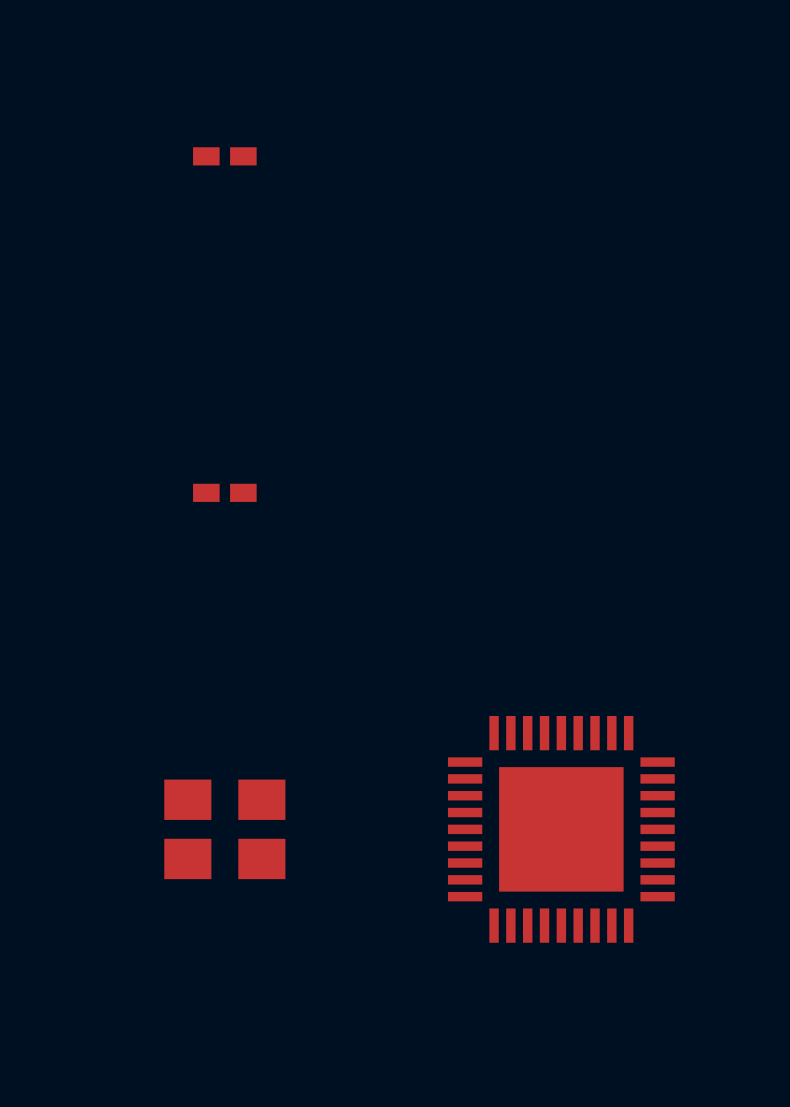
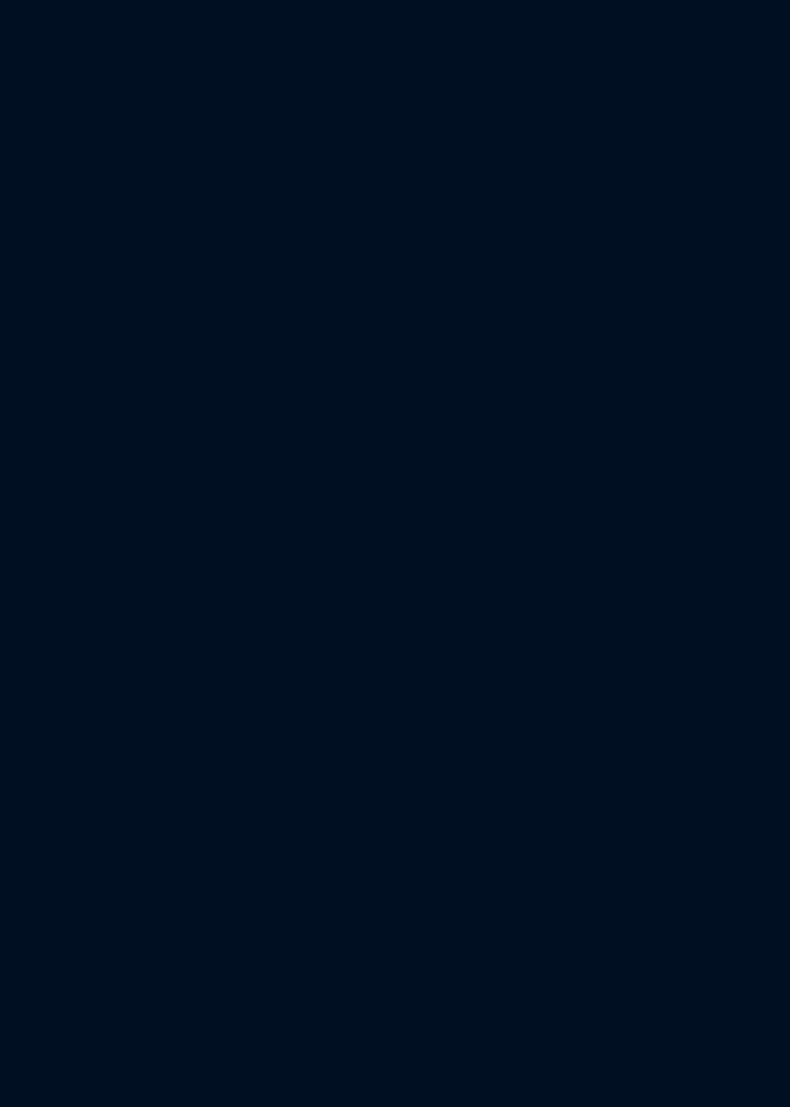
part: (224, 156) -> none
part: (224, 492) -> none
part: (224, 829) -> none
part: (561, 829) -> none

